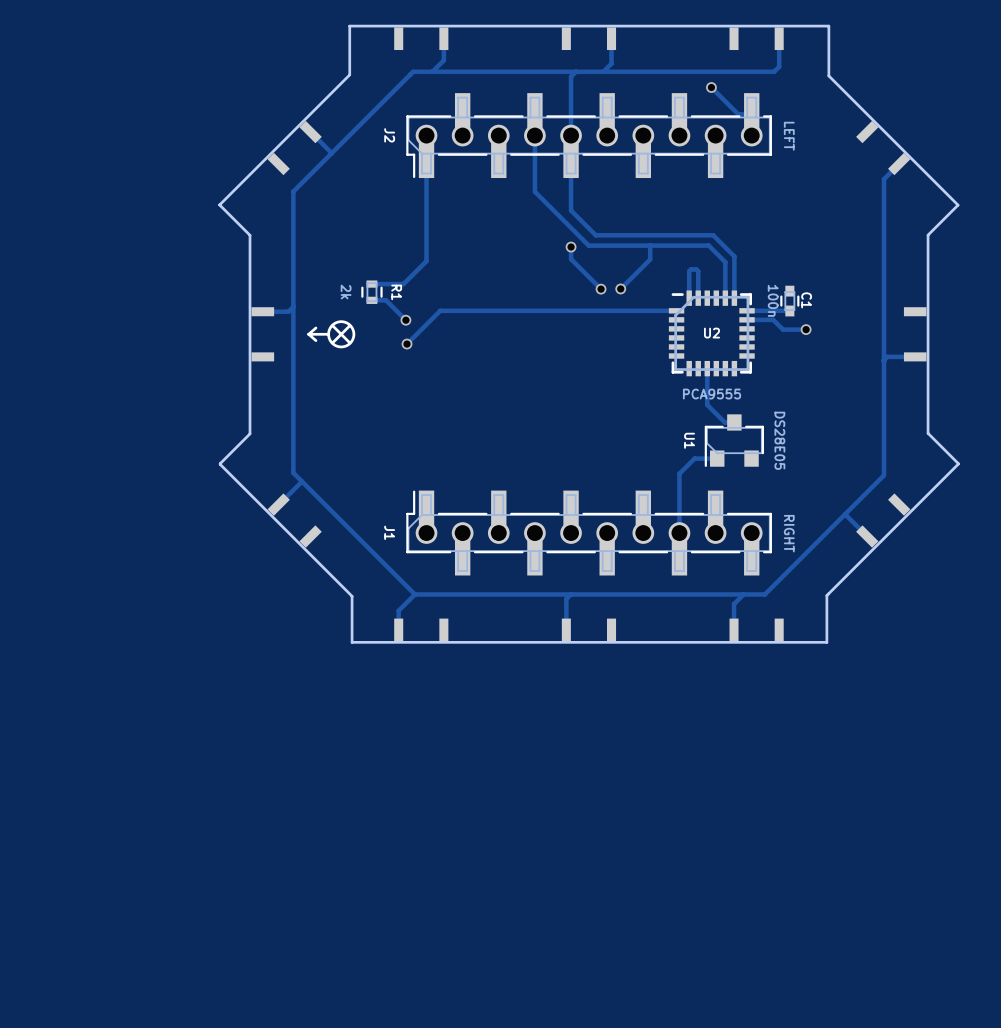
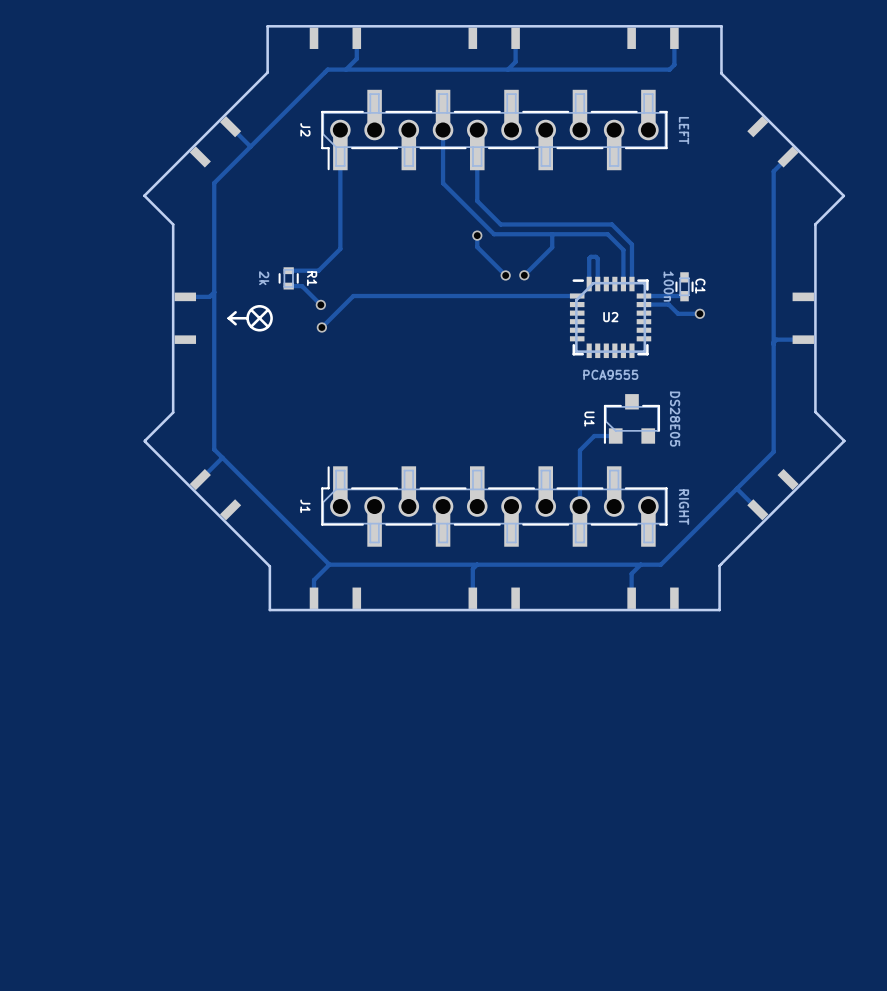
track: (575, 71) (571, 76) (571, 135) -> none
track: (711, 87) (738, 114) (751, 114) -> none
via: (711, 87) -> none
track: (707, 368) (707, 404) (724, 422) (734, 422) -> none

